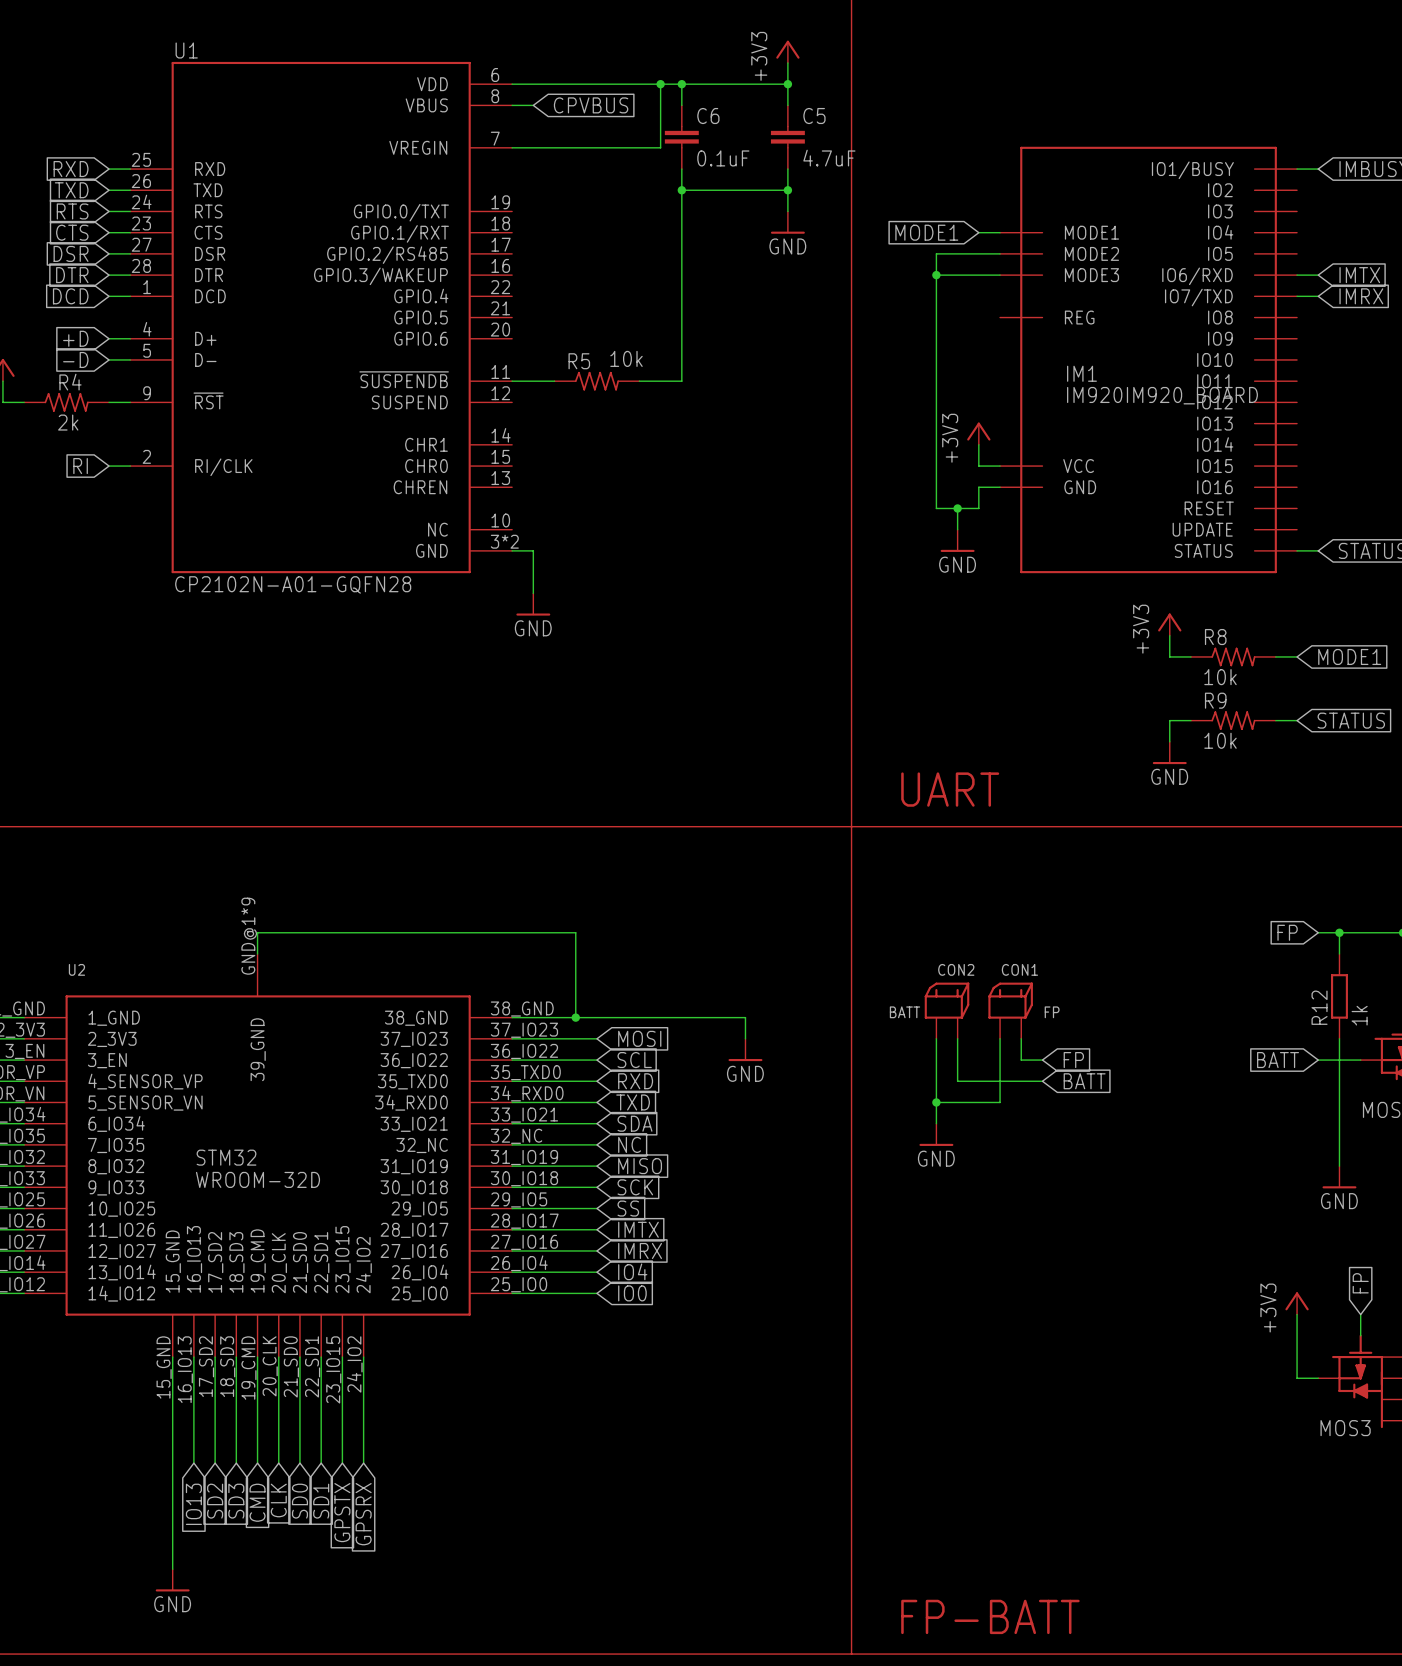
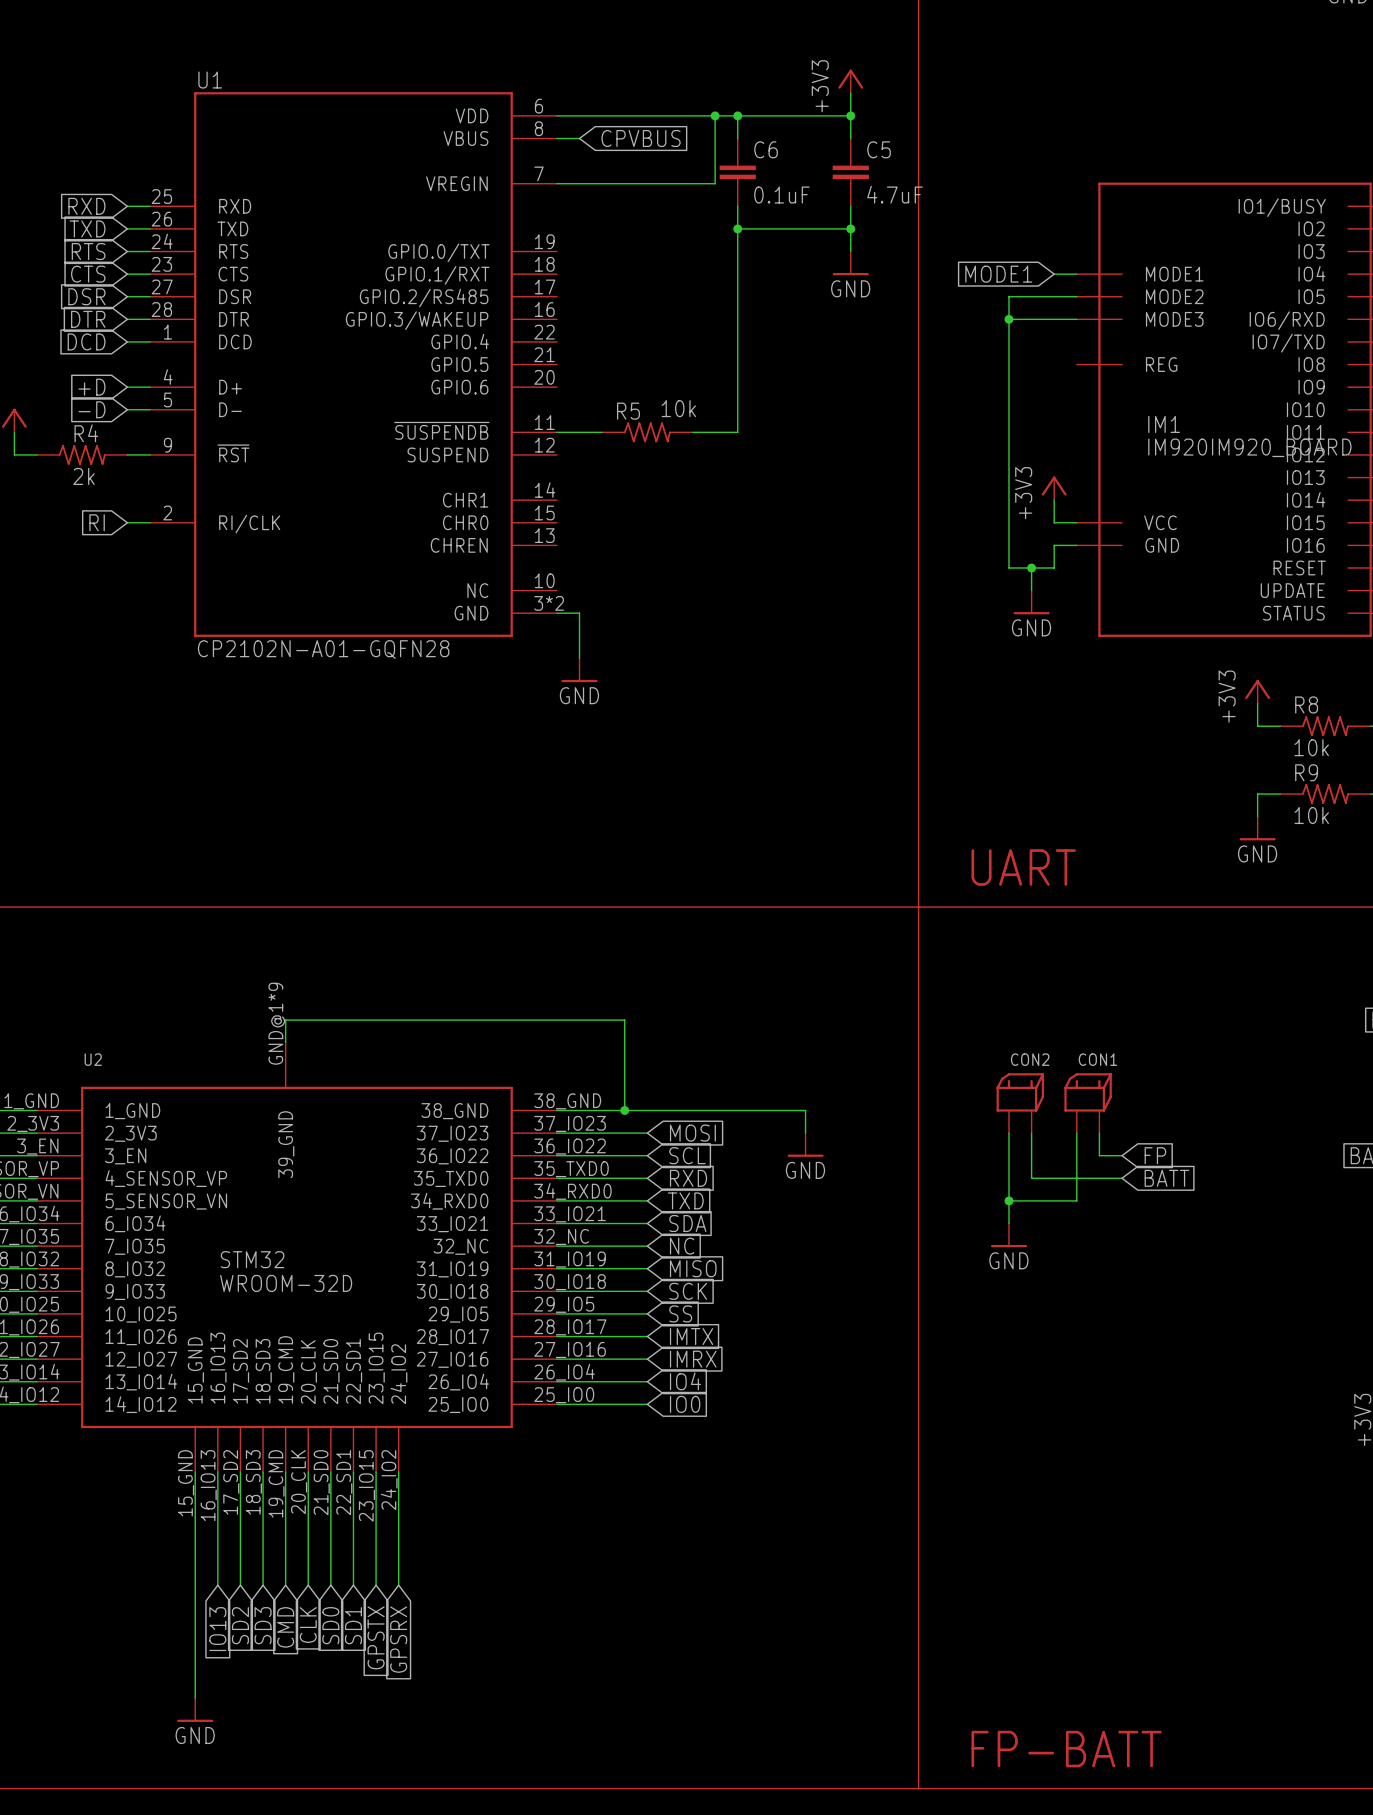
CON2 value: BATT (904, 1012) -> none
CON1 value: FP (1052, 1012) -> none

